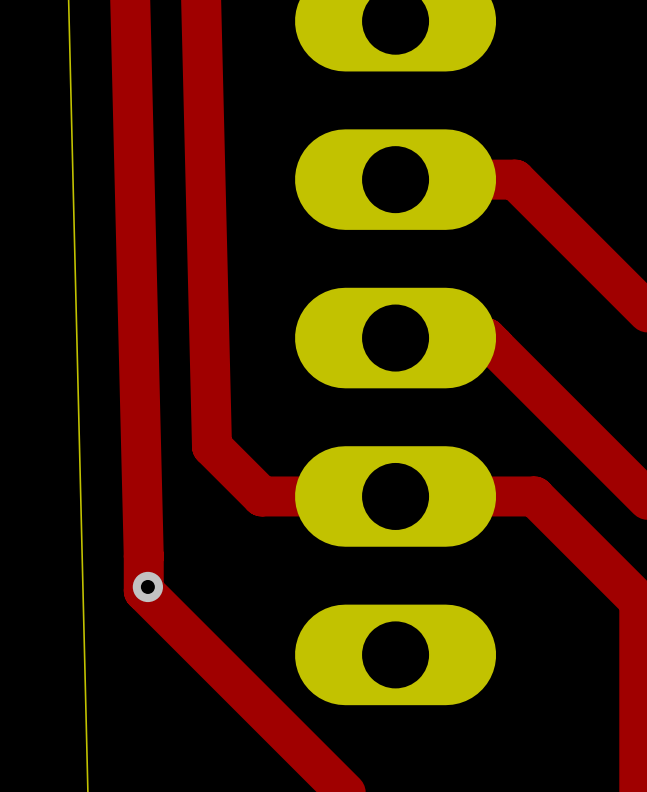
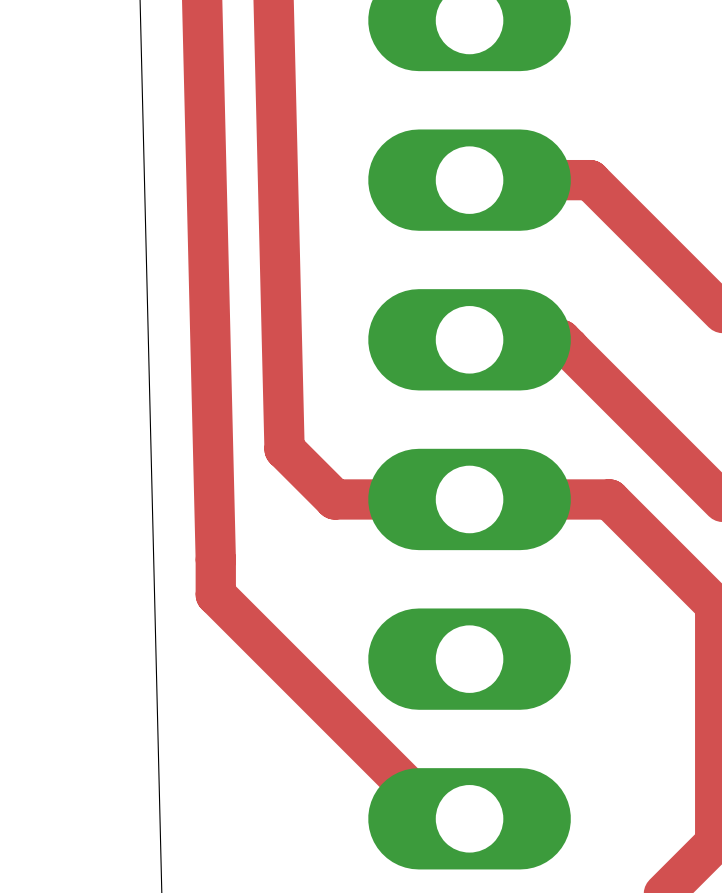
via: (147, 586) -> none

